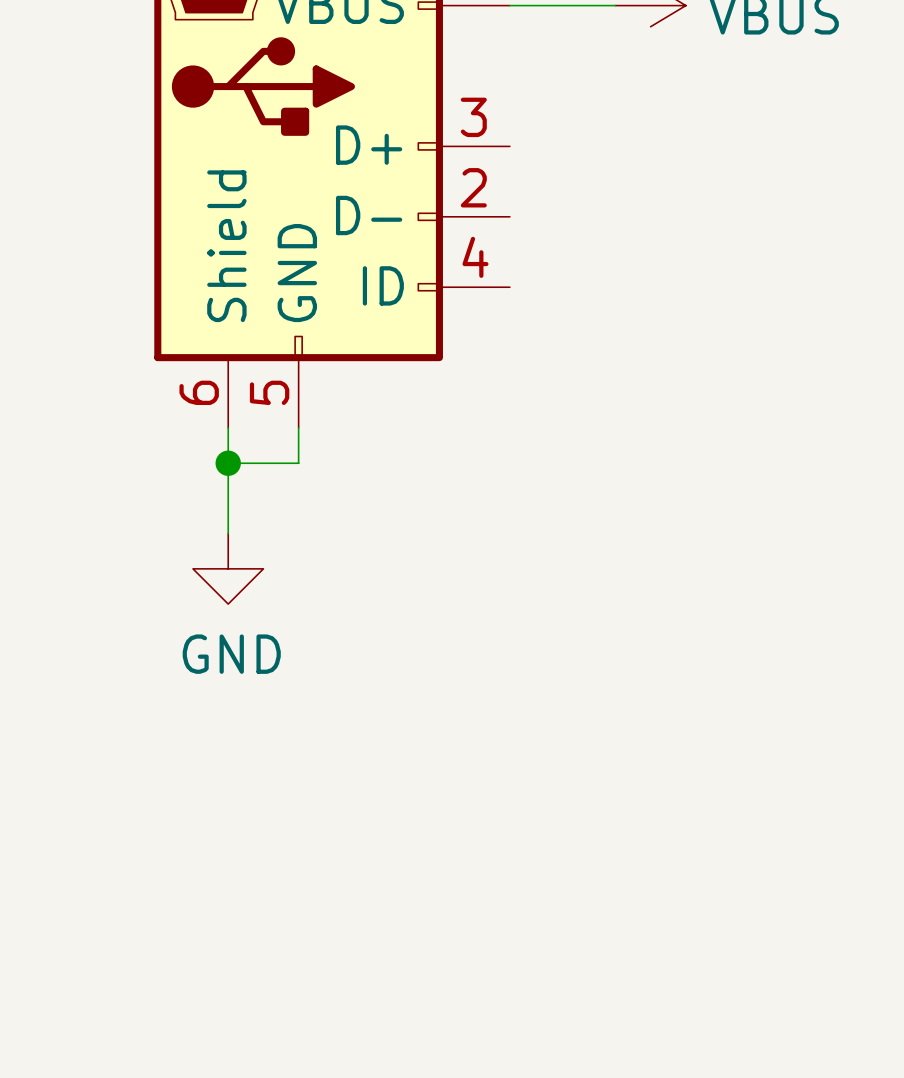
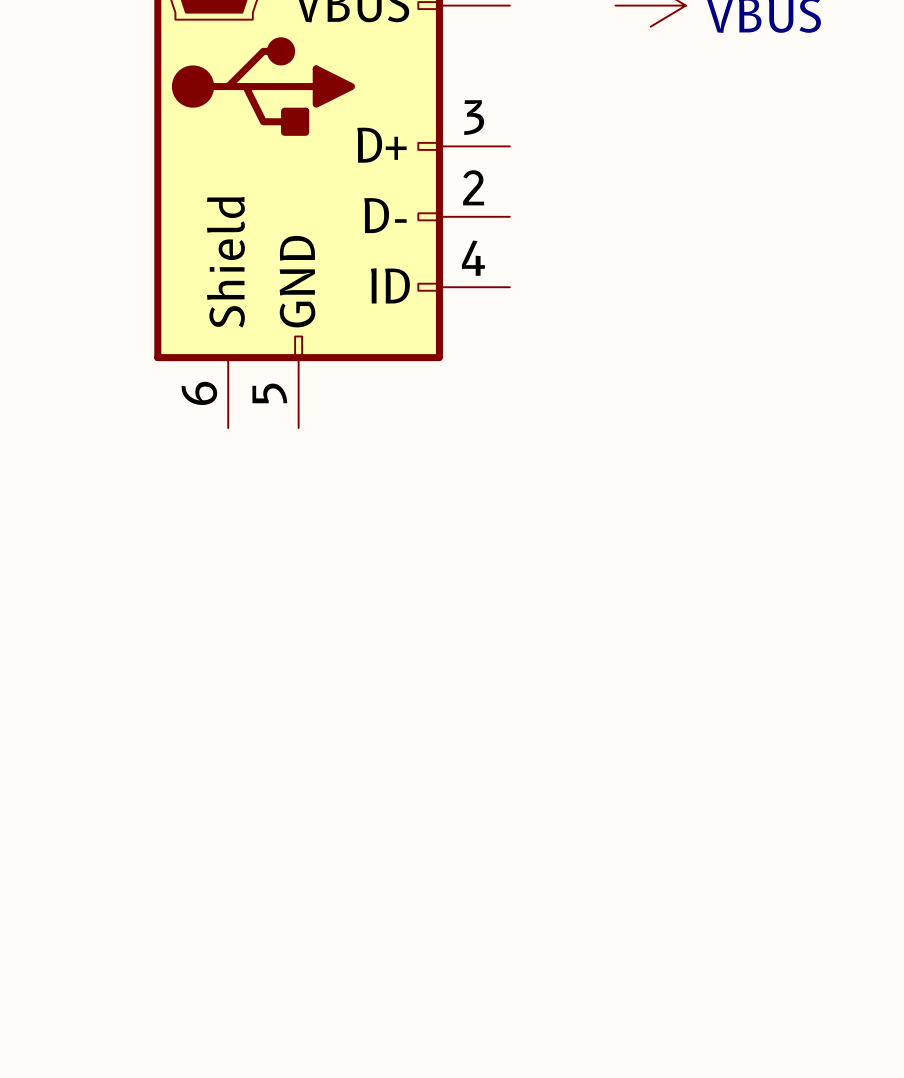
wire: (509, 5) (615, 5) -> none
wire: (228, 428) (228, 533) -> none
wire: (298, 428) (298, 463) (228, 463) -> none
junction: (228, 463) -> none
power symbol: GND (228, 568) -> none

